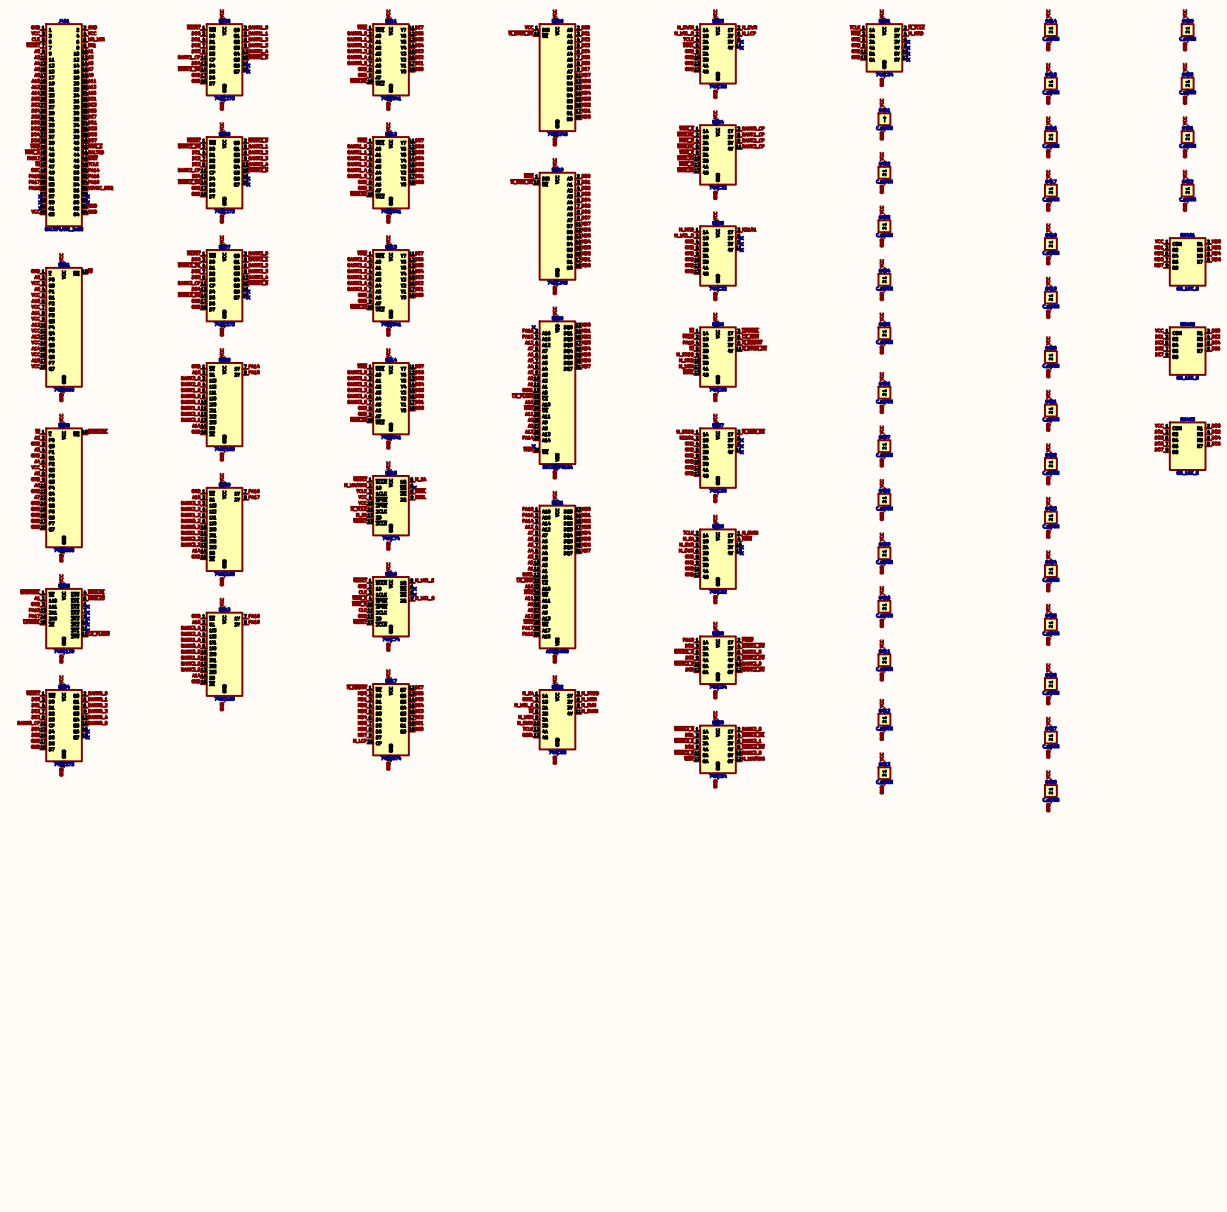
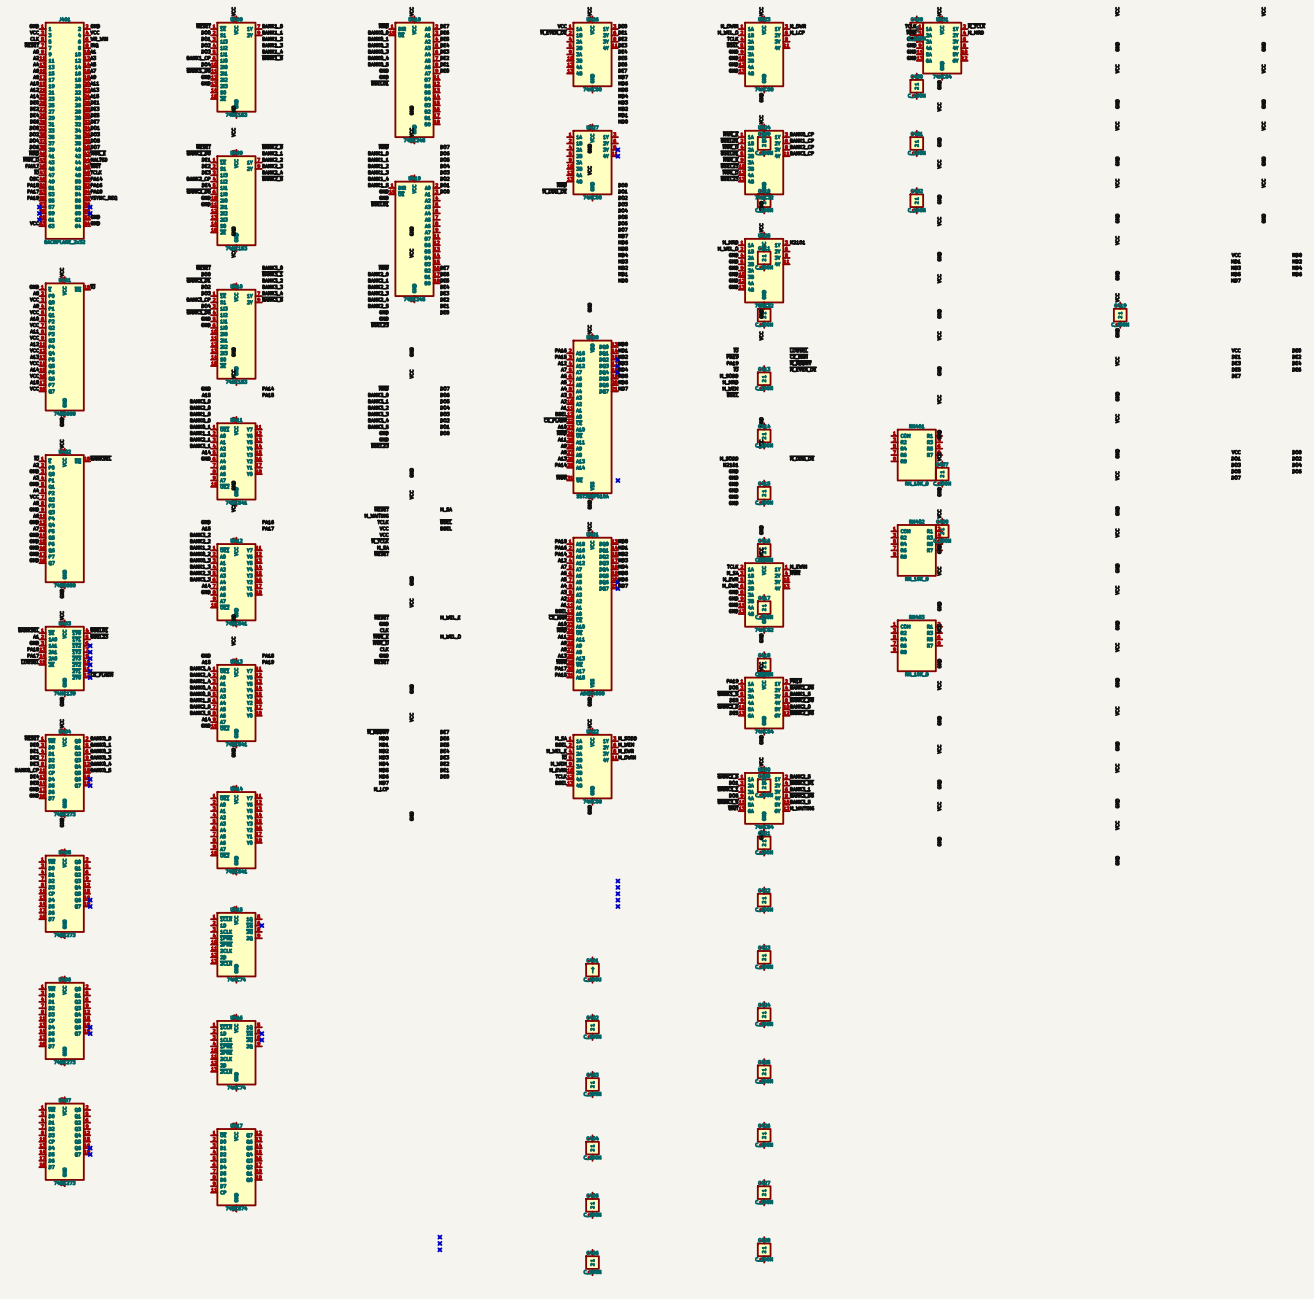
part position: (1050, 30) -> (764, 435)
part position: (1187, 30) -> (916, 29)
no-connect mark: (741, 41) -> none
no-connect mark: (908, 41) -> none
no-connect mark: (741, 47) -> none
no-connect mark: (908, 47) -> none
no-connect mark: (908, 53) -> none
part position: (224, 59) -> (64, 893)
part position: (391, 59) -> (236, 461)
no-connect mark: (908, 59) -> none
no-connect mark: (248, 65) -> none
no-connect mark: (248, 71) -> none
part position: (557, 77) -> (414, 79)
part position: (1050, 83) -> (764, 493)
part position: (1187, 83) -> (916, 86)
part position: (884, 119) -> (592, 970)
part position: (1050, 137) -> (764, 550)
part position: (1187, 137) -> (916, 143)
no-connect mark: none -> (617, 149)
no-connect mark: none -> (617, 156)
part position: (224, 172) -> (64, 1020)
part position: (391, 172) -> (236, 582)
part position: (884, 172) -> (592, 1027)
no-connect mark: (248, 178) -> none
no-connect mark: (248, 184) -> none
part position: (1050, 190) -> (764, 607)
part position: (1187, 190) -> (916, 200)
part position: (557, 226) -> (414, 238)
part position: (884, 226) -> (592, 1084)
no-connect mark: (741, 238) -> none
no-connect mark: (741, 244) -> none
part position: (1050, 244) -> (764, 664)
no-connect mark: (741, 250) -> none
part position: (1187, 261) -> (916, 455)
part position: (884, 279) -> (592, 1148)
part position: (224, 285) -> (64, 1141)
part position: (391, 285) -> (236, 703)
no-connect mark: (248, 291) -> none
no-connect mark: (248, 297) -> none
no-connect mark: (533, 327) -> none
part position: (884, 333) -> (592, 1205)
no-connect mark: none -> (617, 359)
no-connect mark: none -> (617, 366)
no-connect mark: none -> (617, 372)
part position: (1187, 351) -> (916, 550)
part position: (717, 357) -> (592, 54)
part position: (1050, 357) -> (764, 785)
part position: (884, 392) -> (592, 1262)
part position: (391, 398) -> (236, 830)
part position: (224, 404) -> (236, 67)
part position: (1050, 410) -> (764, 842)
no-connect mark: (741, 440) -> none
no-connect mark: (533, 446) -> none
no-connect mark: (741, 446) -> none
part position: (1187, 446) -> (916, 645)
no-connect mark: none -> (617, 480)
no-connect mark: (741, 452) -> none
part position: (717, 458) -> (592, 162)
part position: (1050, 464) -> (764, 900)
no-connect mark: (414, 487) -> none
part position: (391, 505) -> (236, 944)
part position: (1050, 517) -> (764, 957)
part position: (224, 529) -> (236, 200)
no-connect mark: none -> (617, 582)
no-connect mark: (741, 547) -> none
no-connect mark: none -> (617, 588)
no-connect mark: (741, 553) -> none
part position: (884, 553) -> (764, 143)
part position: (1050, 571) -> (764, 1014)
no-connect mark: (414, 588) -> none
no-connect mark: (414, 594) -> none
part position: (391, 606) -> (236, 1052)
part position: (884, 606) -> (764, 200)
part position: (1050, 624) -> (764, 1071)
no-connect mark: none -> (90, 677)
part position: (224, 654) -> (236, 334)
part position: (884, 660) -> (764, 257)
part position: (1050, 684) -> (764, 1135)
part position: (391, 719) -> (236, 1167)
part position: (884, 719) -> (764, 315)
part position: (1050, 737) -> (764, 1192)
part position: (884, 773) -> (764, 378)
part position: (1050, 791) -> (764, 1249)
no-connect mark: none -> (617, 881)
no-connect mark: none -> (617, 887)
no-connect mark: none -> (617, 893)
no-connect mark: none -> (90, 900)
no-connect mark: none -> (617, 900)
no-connect mark: none -> (90, 906)
no-connect mark: none -> (617, 906)
no-connect mark: none -> (261, 925)
no-connect mark: none -> (90, 1027)
no-connect mark: none -> (90, 1033)
no-connect mark: none -> (261, 1033)
no-connect mark: none -> (261, 1040)
no-connect mark: none -> (90, 1148)
no-connect mark: none -> (90, 1154)
no-connect mark: none -> (439, 1237)
no-connect mark: none -> (439, 1243)
no-connect mark: none -> (439, 1249)

